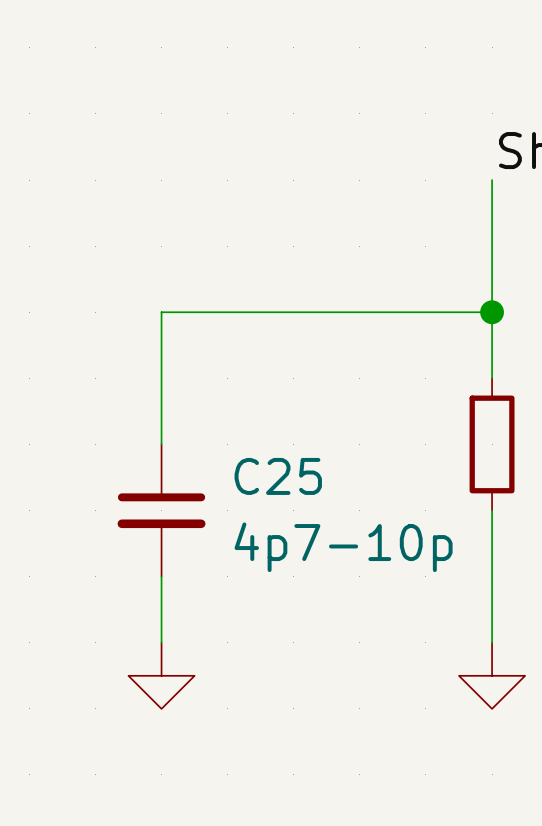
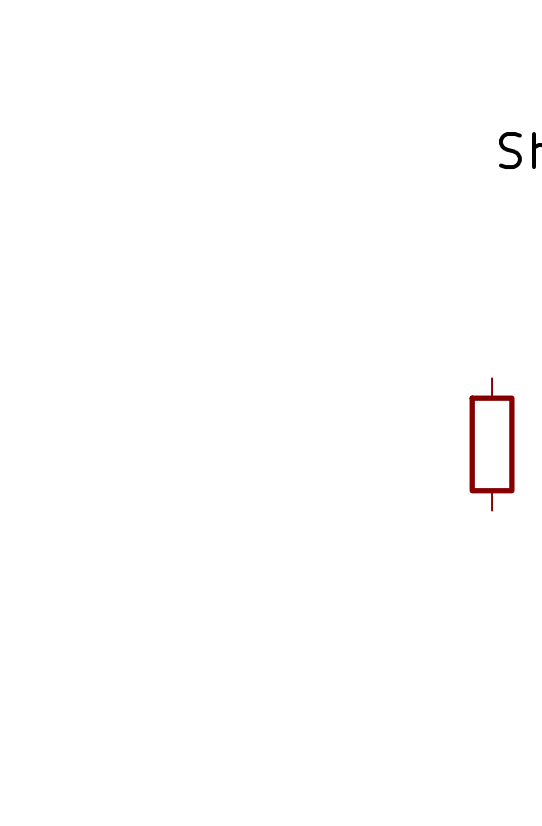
wire: (492, 180) (492, 378) -> none
wire: (492, 312) (161, 312) (161, 444) -> none
junction: (492, 312) -> none
C25: 4p7-10p (161, 510) -> none
wire: (492, 510) (492, 642) -> none
wire: (161, 576) (161, 642) -> none
power symbol: (161, 675) -> none
power symbol: (492, 675) -> none

